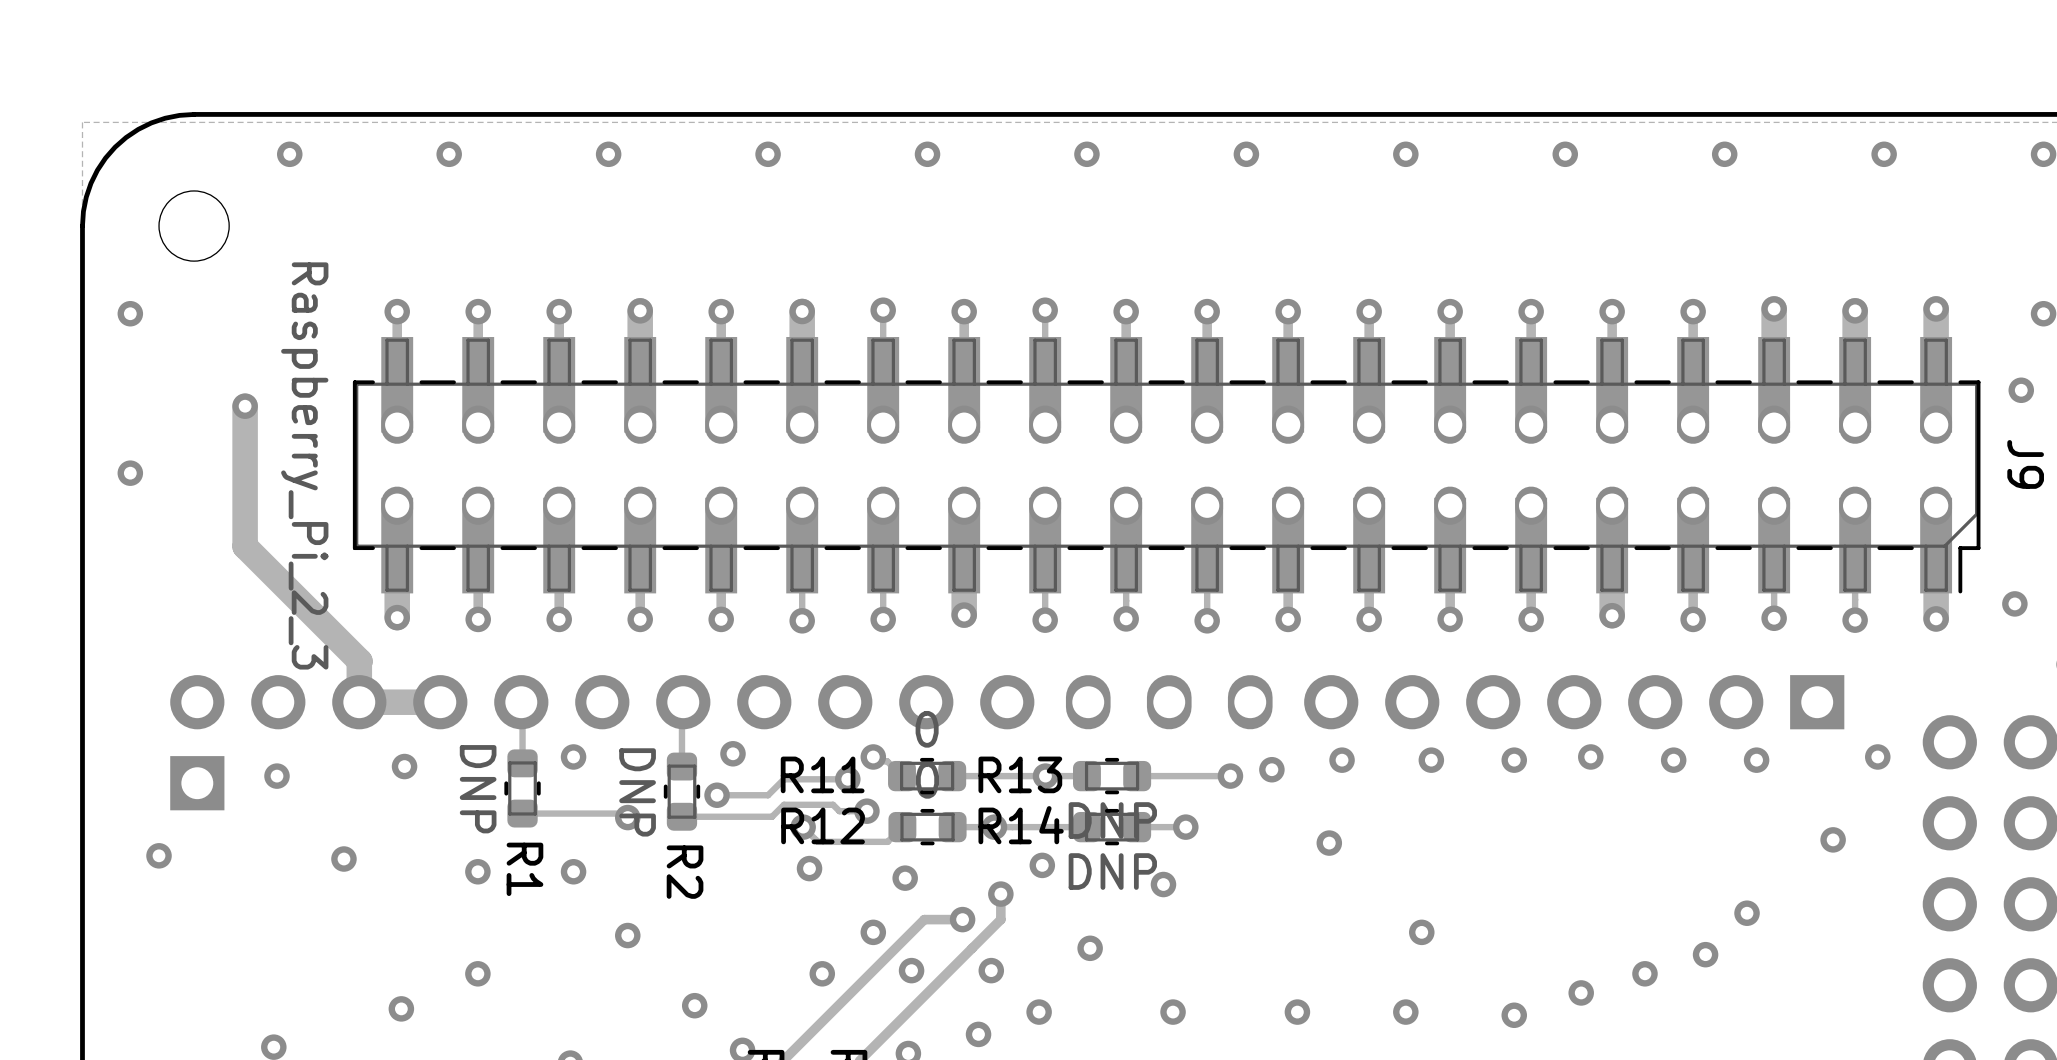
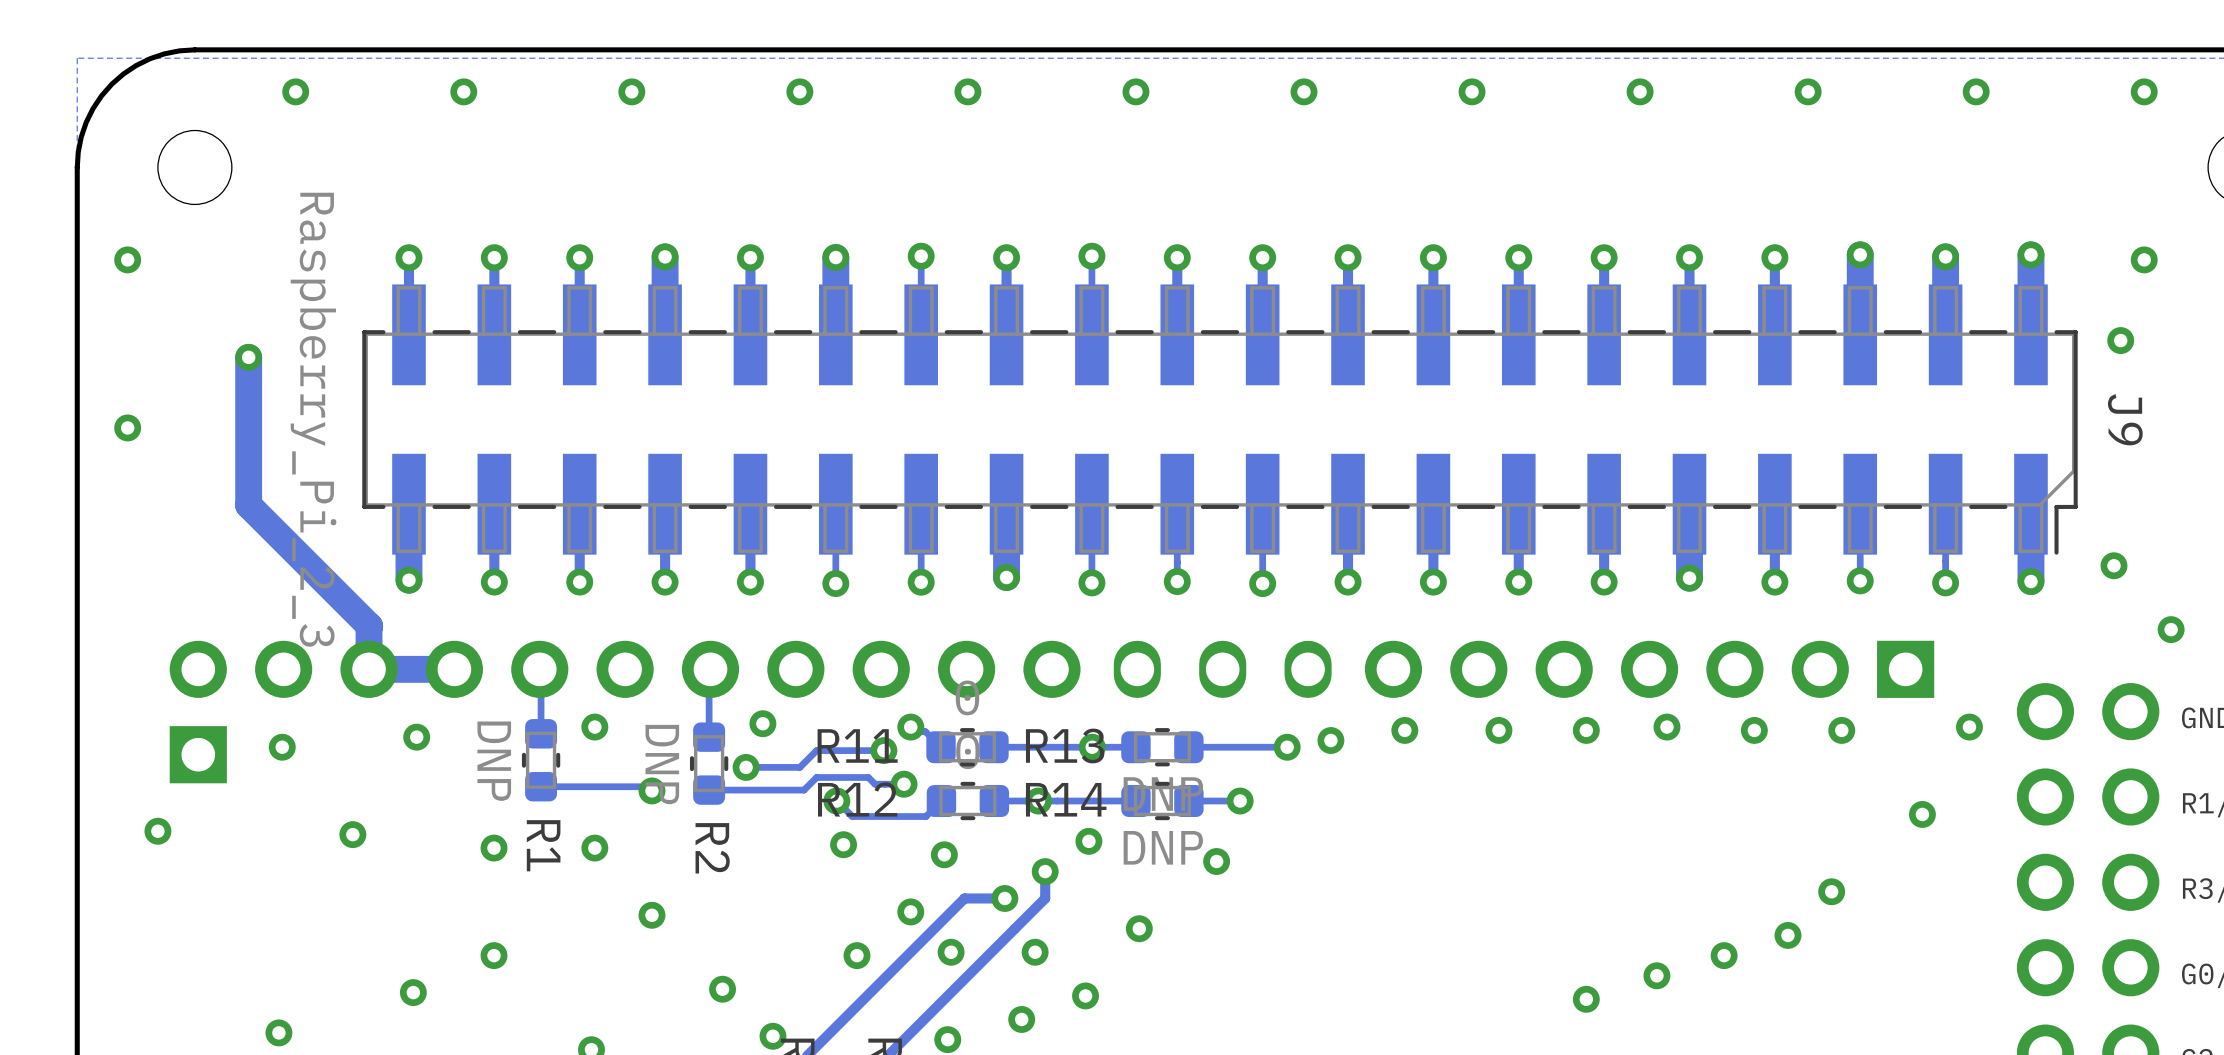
part: (1166, 465) -> none
via: (1329, 843) -> none
via: (1421, 932) -> none
via: (1173, 1012) -> none
via: (1297, 1012) -> none
via: (1405, 1012) -> none

